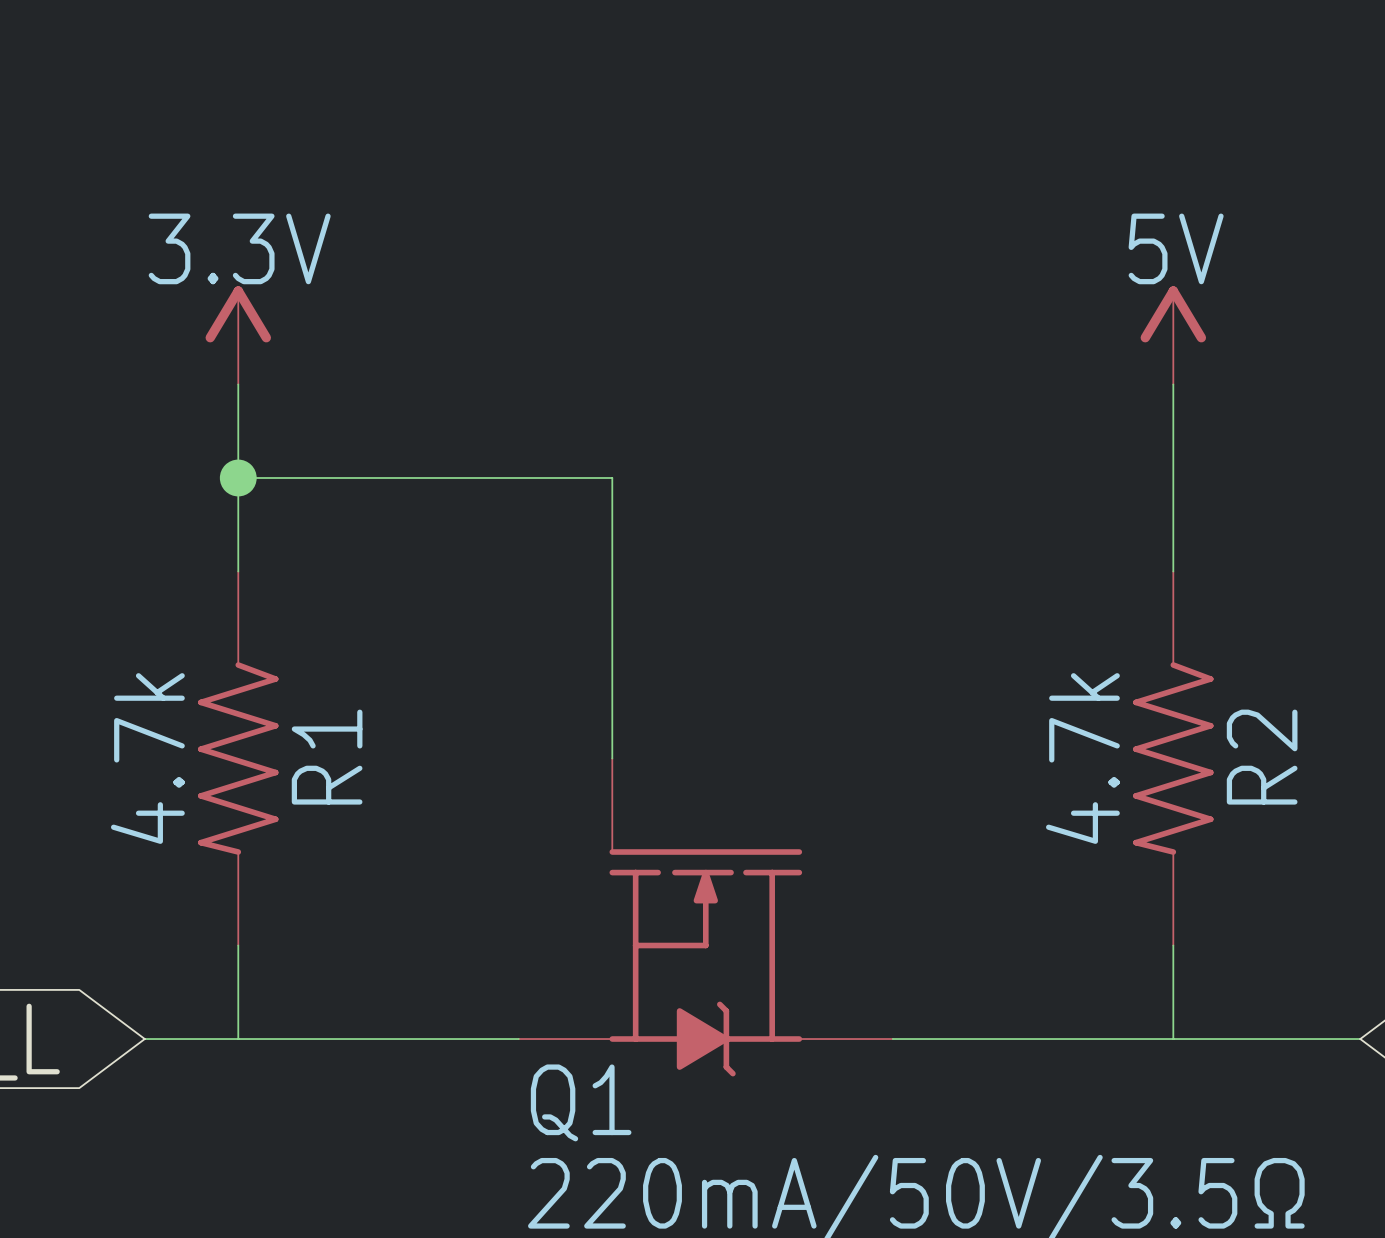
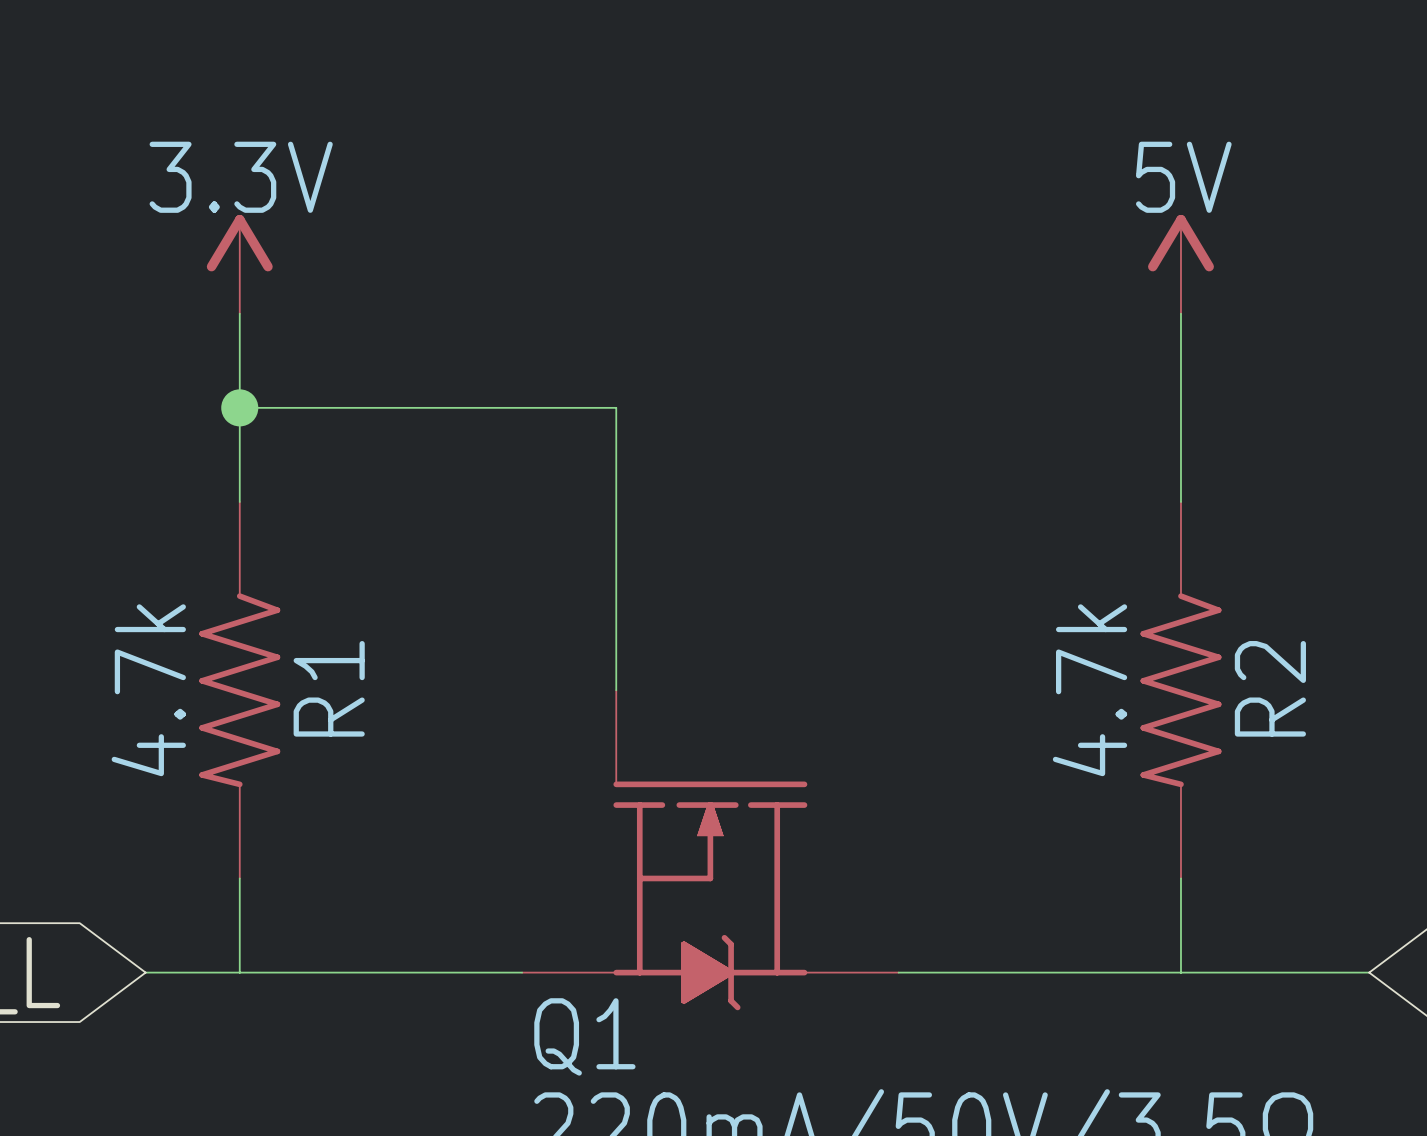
Q1 symbol: [518, 758, 893, 1077] -> [522, 690, 899, 1011]

